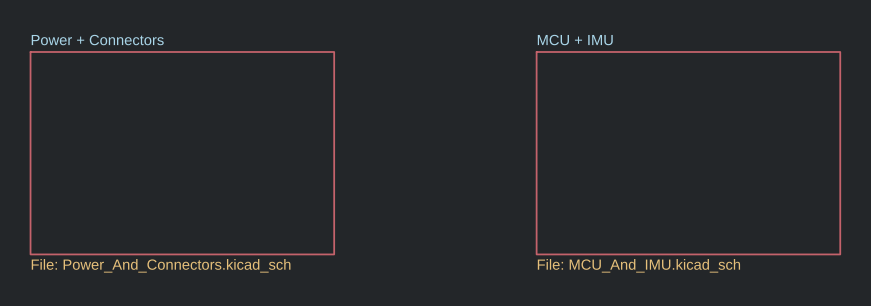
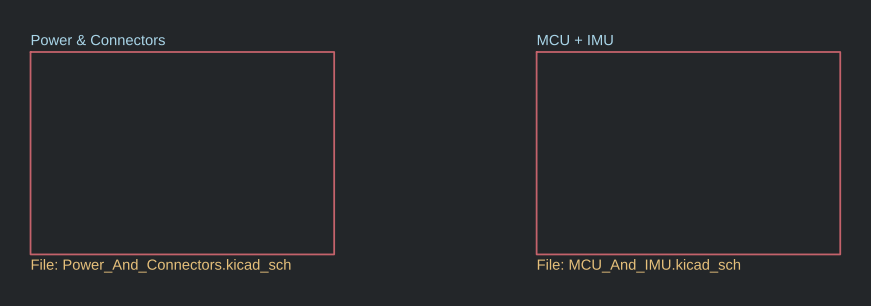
sheet Power + Connectors name: Power + Connectors (97, 40) -> Power & Connectors (98, 40)

